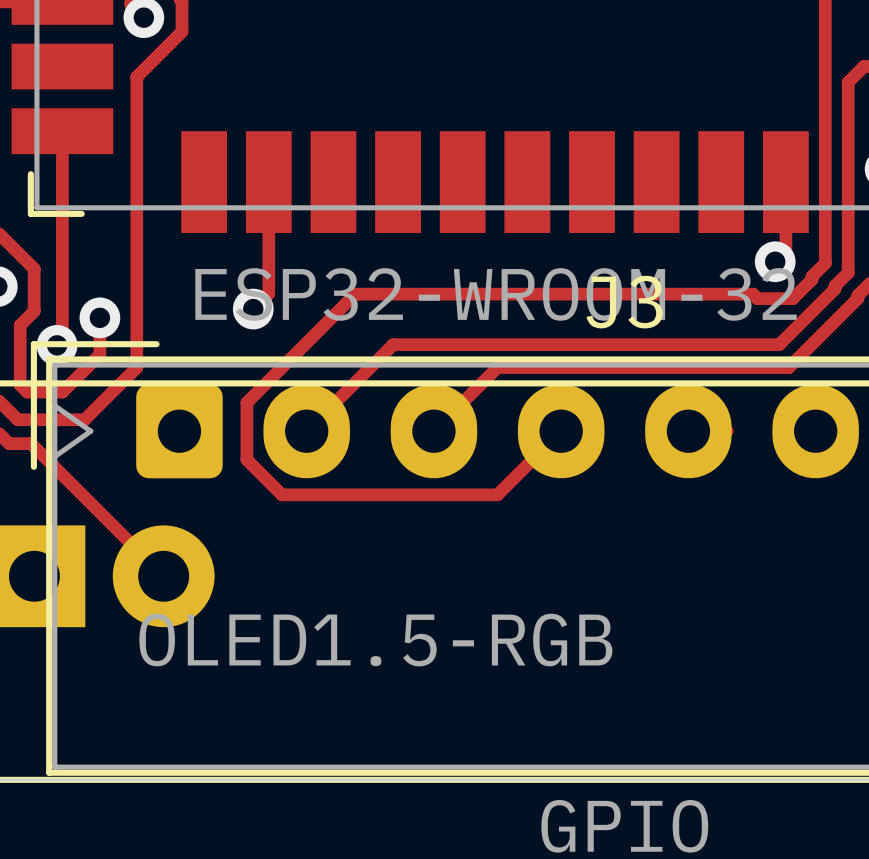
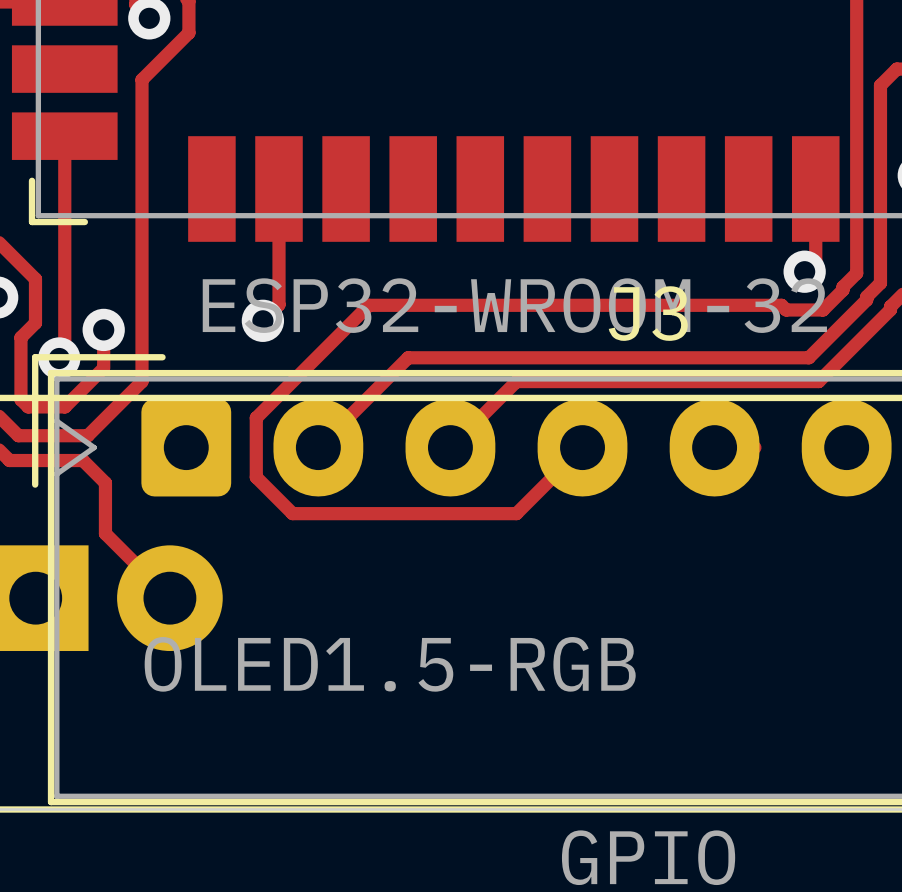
track: (31, 443) (101, 514) -> (32, 460) (82, 460) (105, 483) (105, 533)

